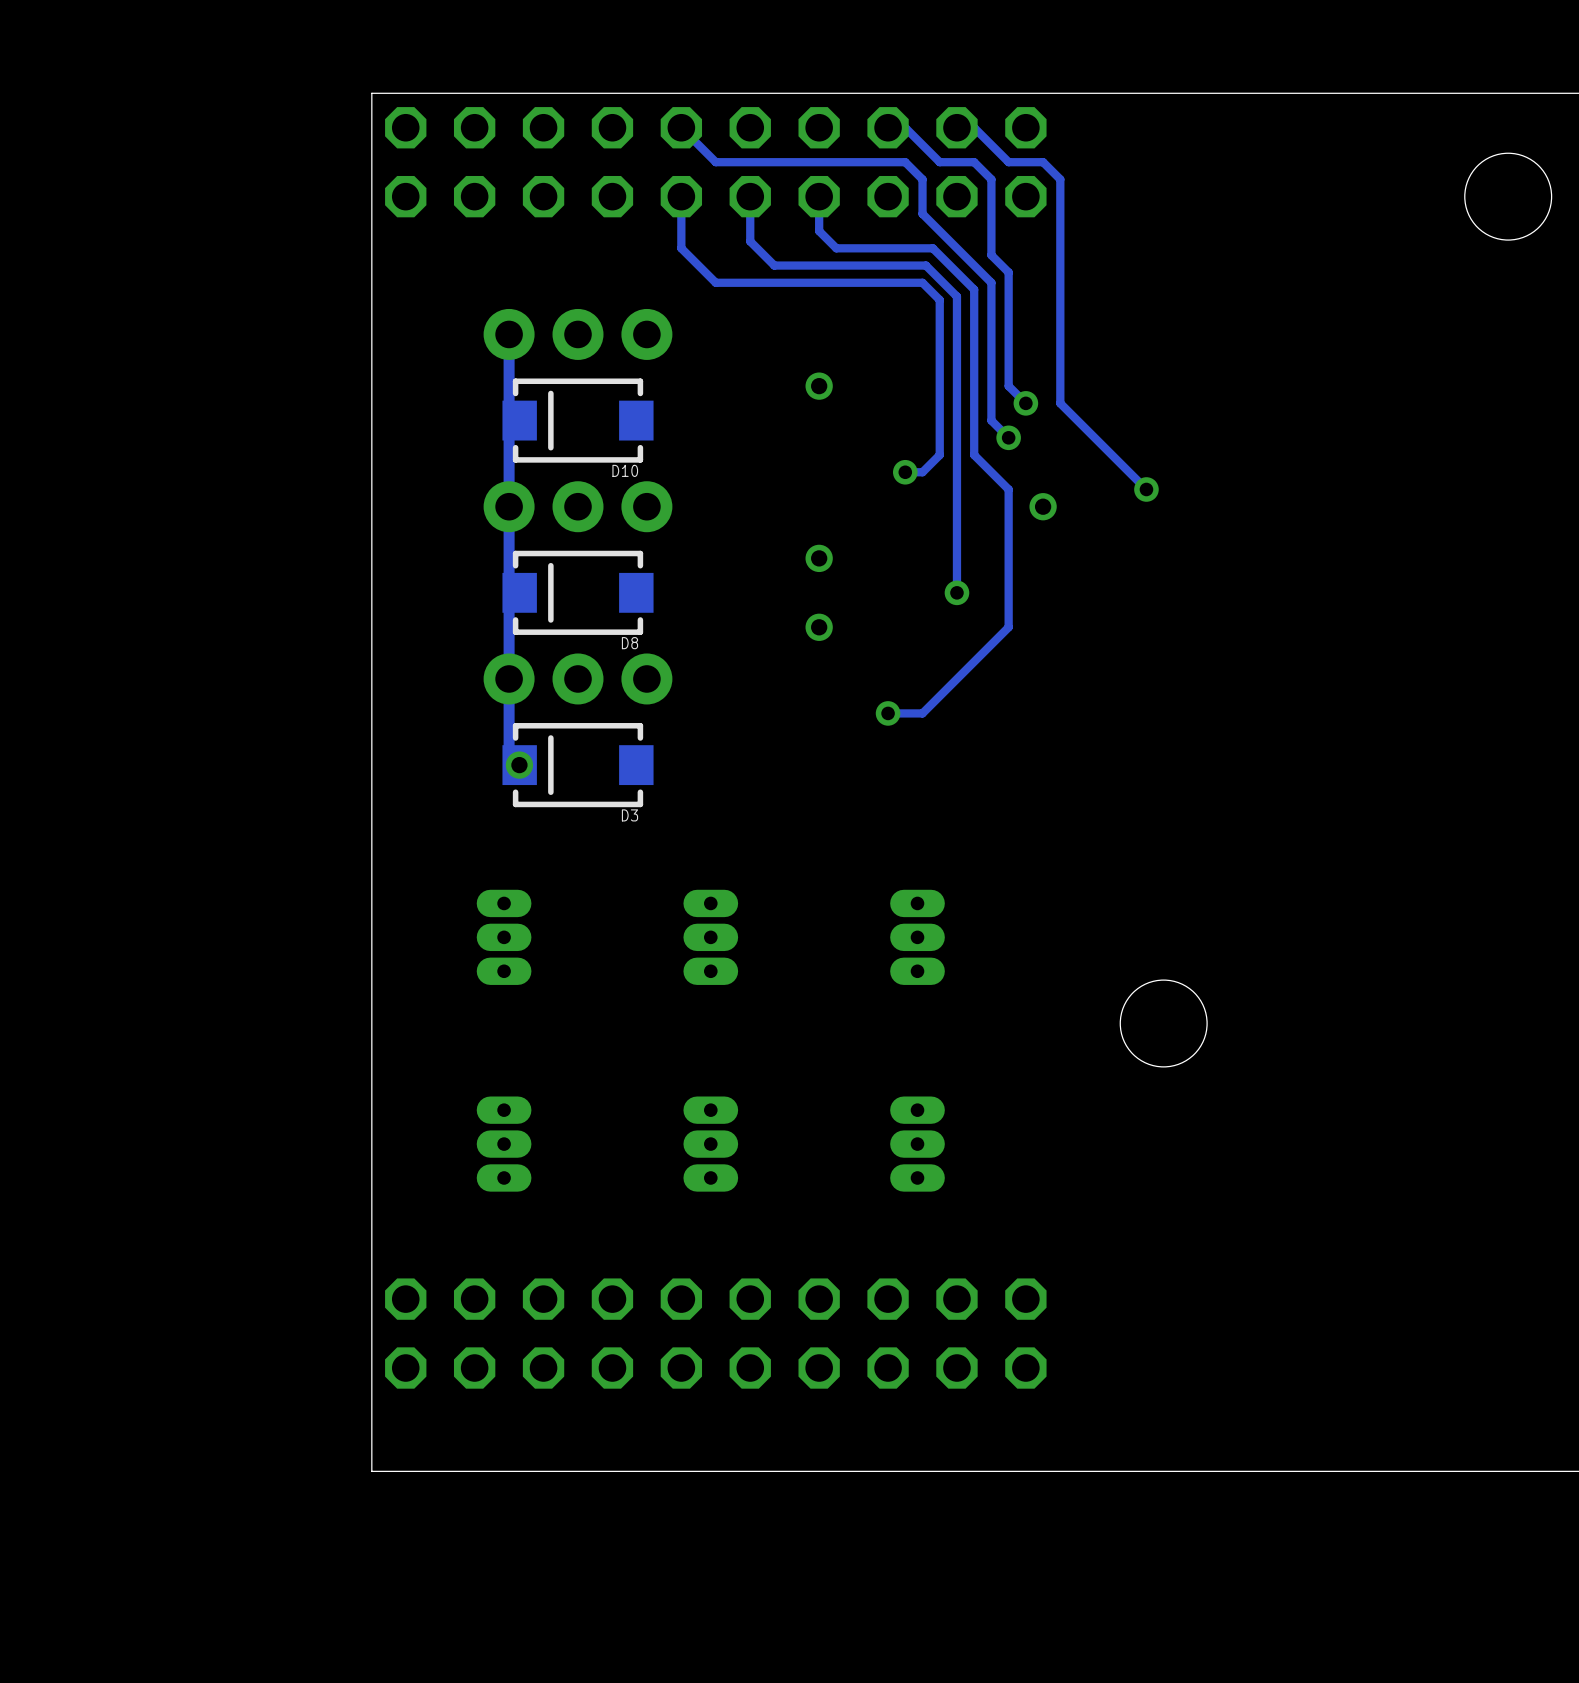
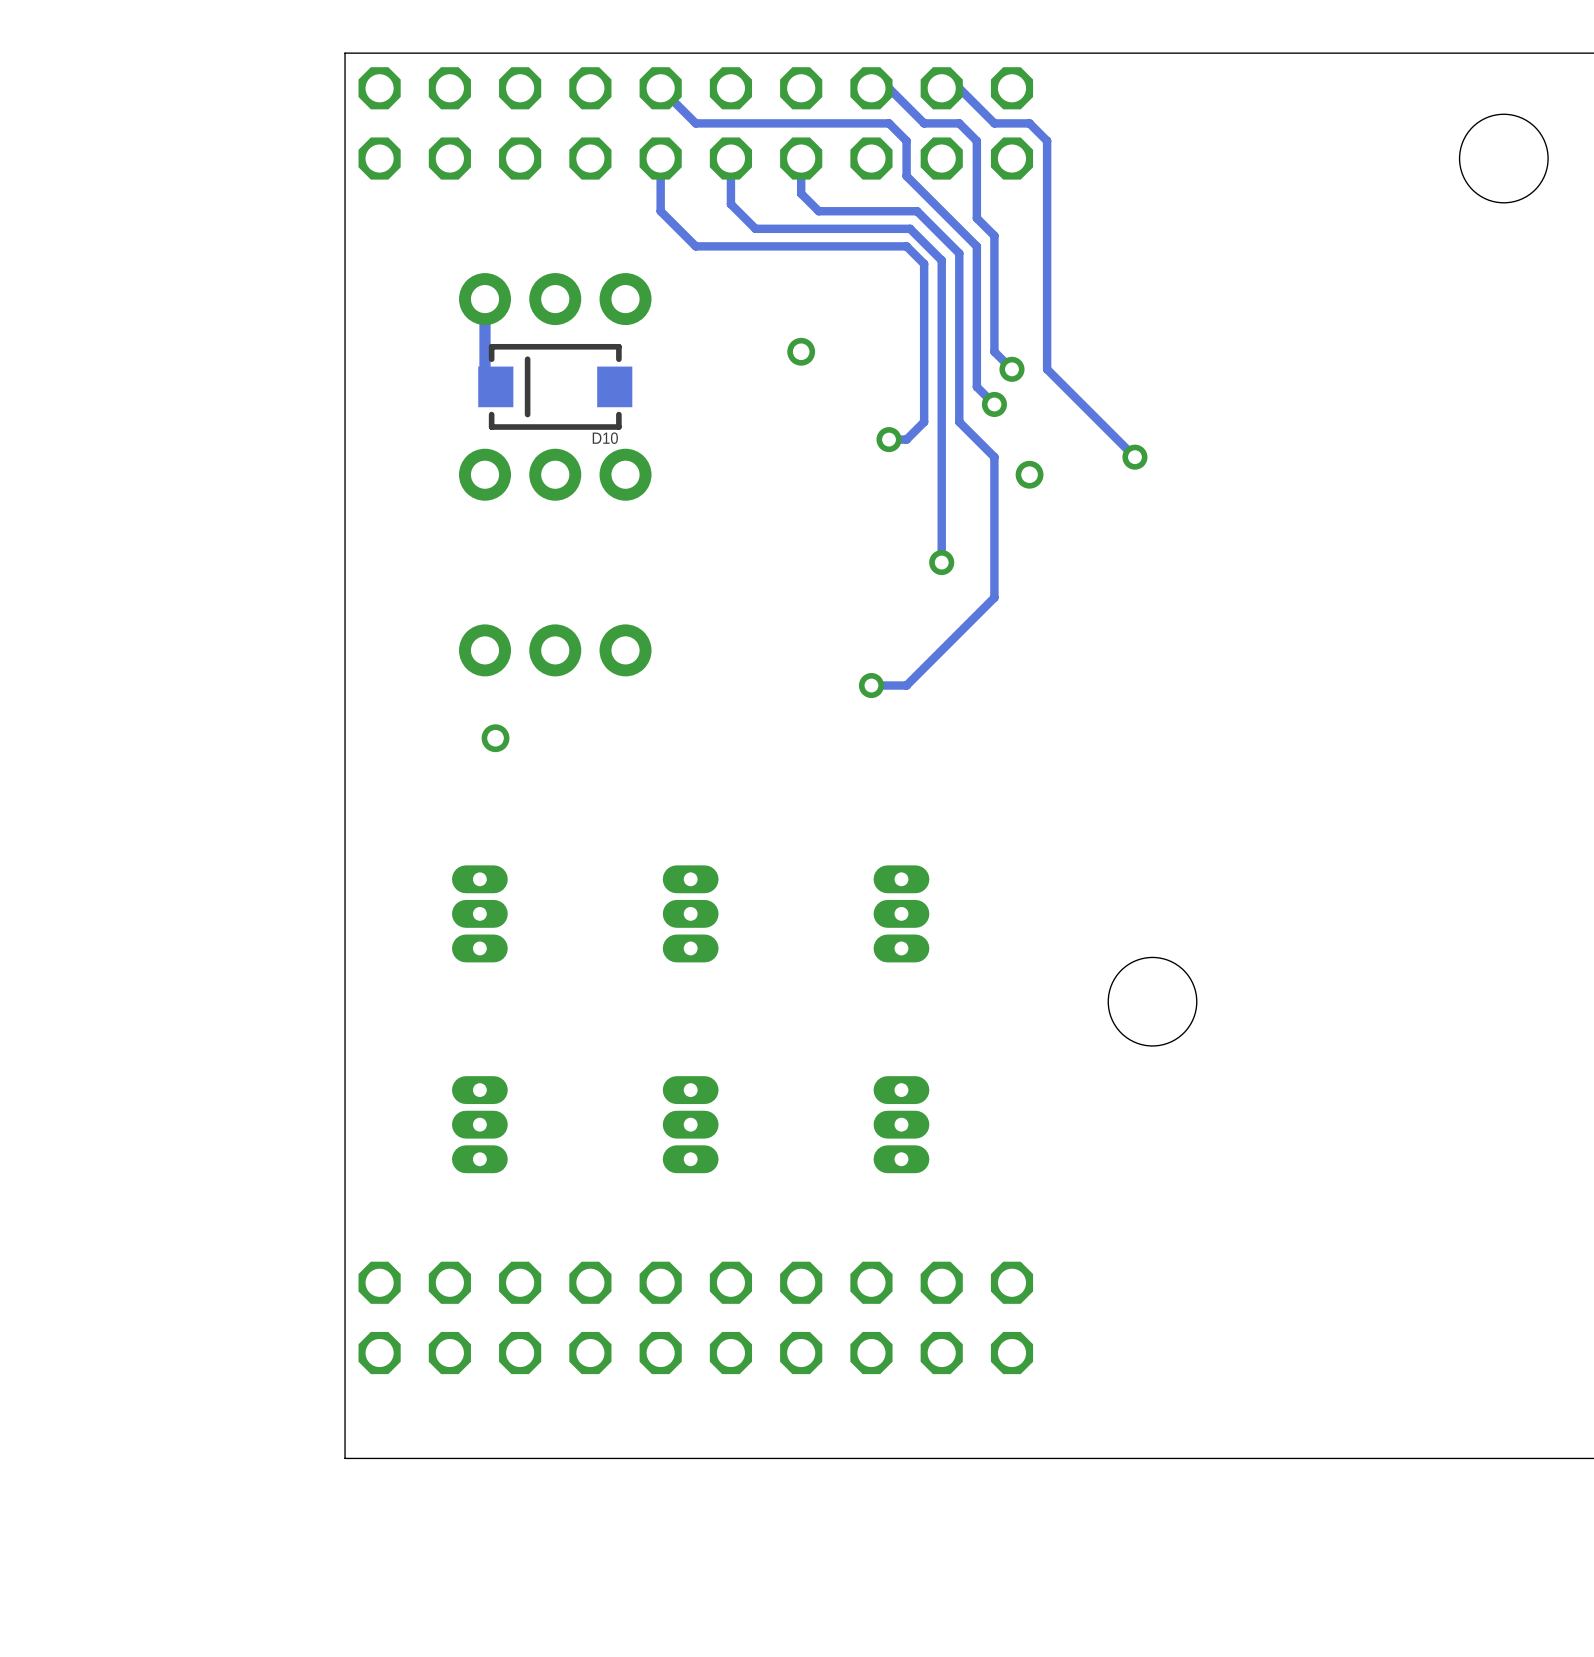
track: (509, 431) (509, 582) (519, 592) (509, 603) (509, 754) (519, 765) -> none
via: (819, 558) -> none
D8: (578, 592) -> none
via: (819, 627) -> none
D3: (578, 765) -> none

